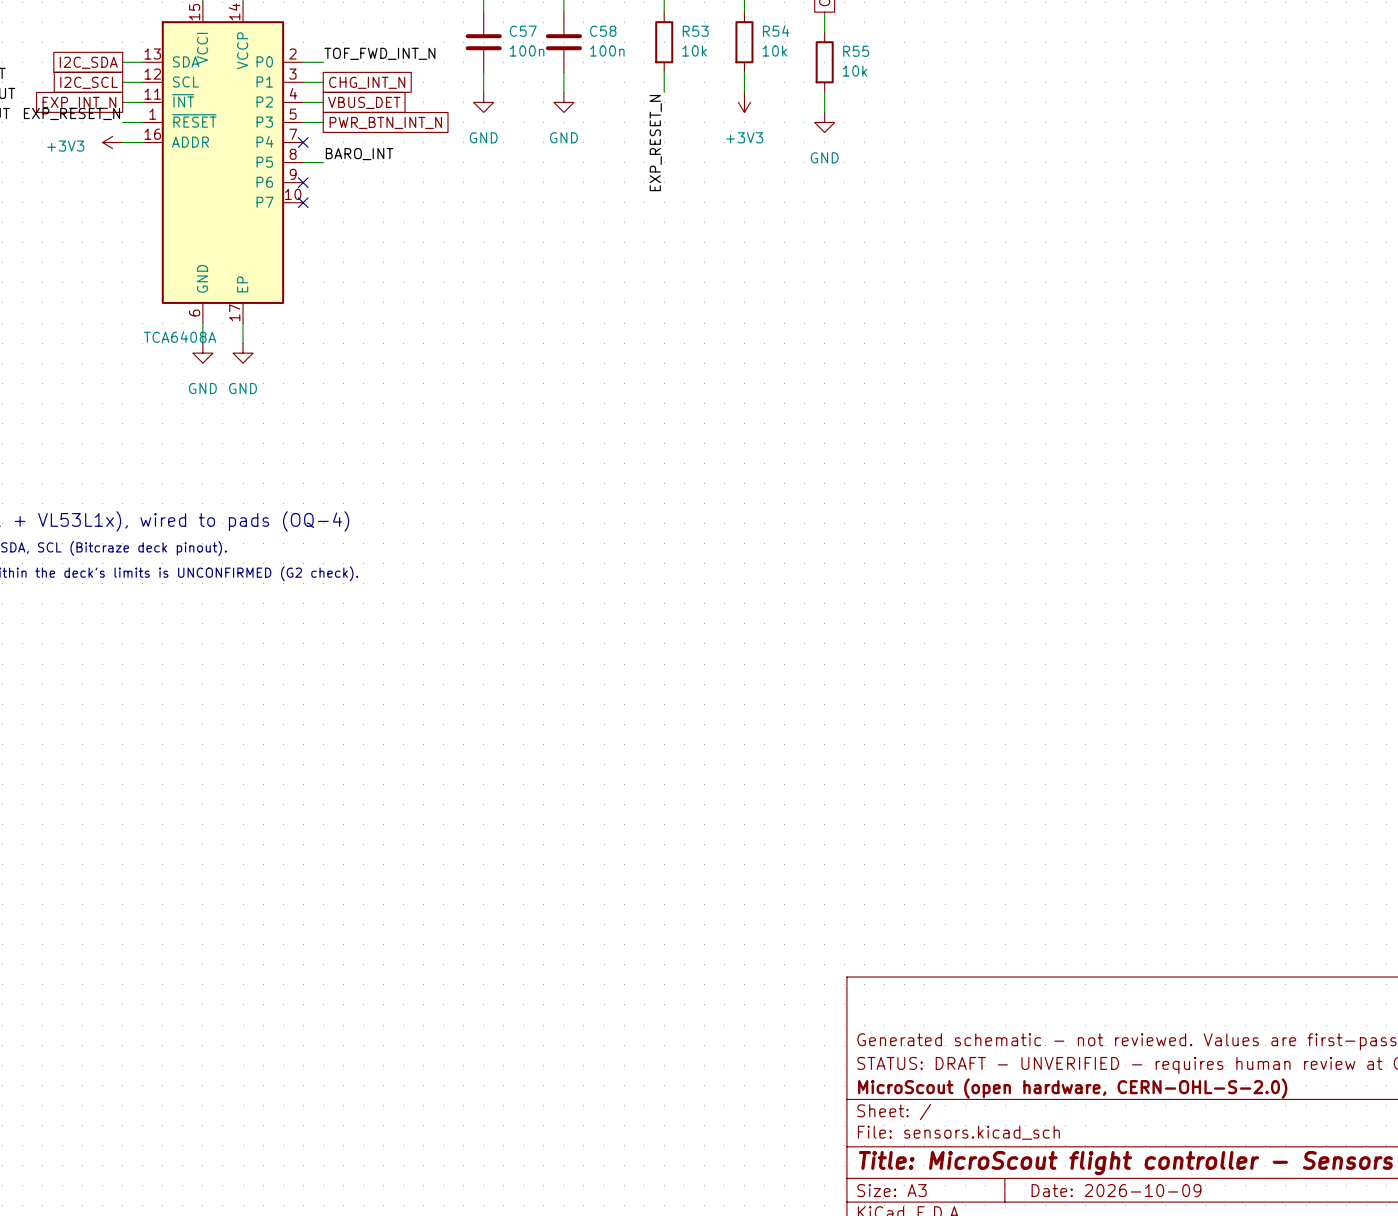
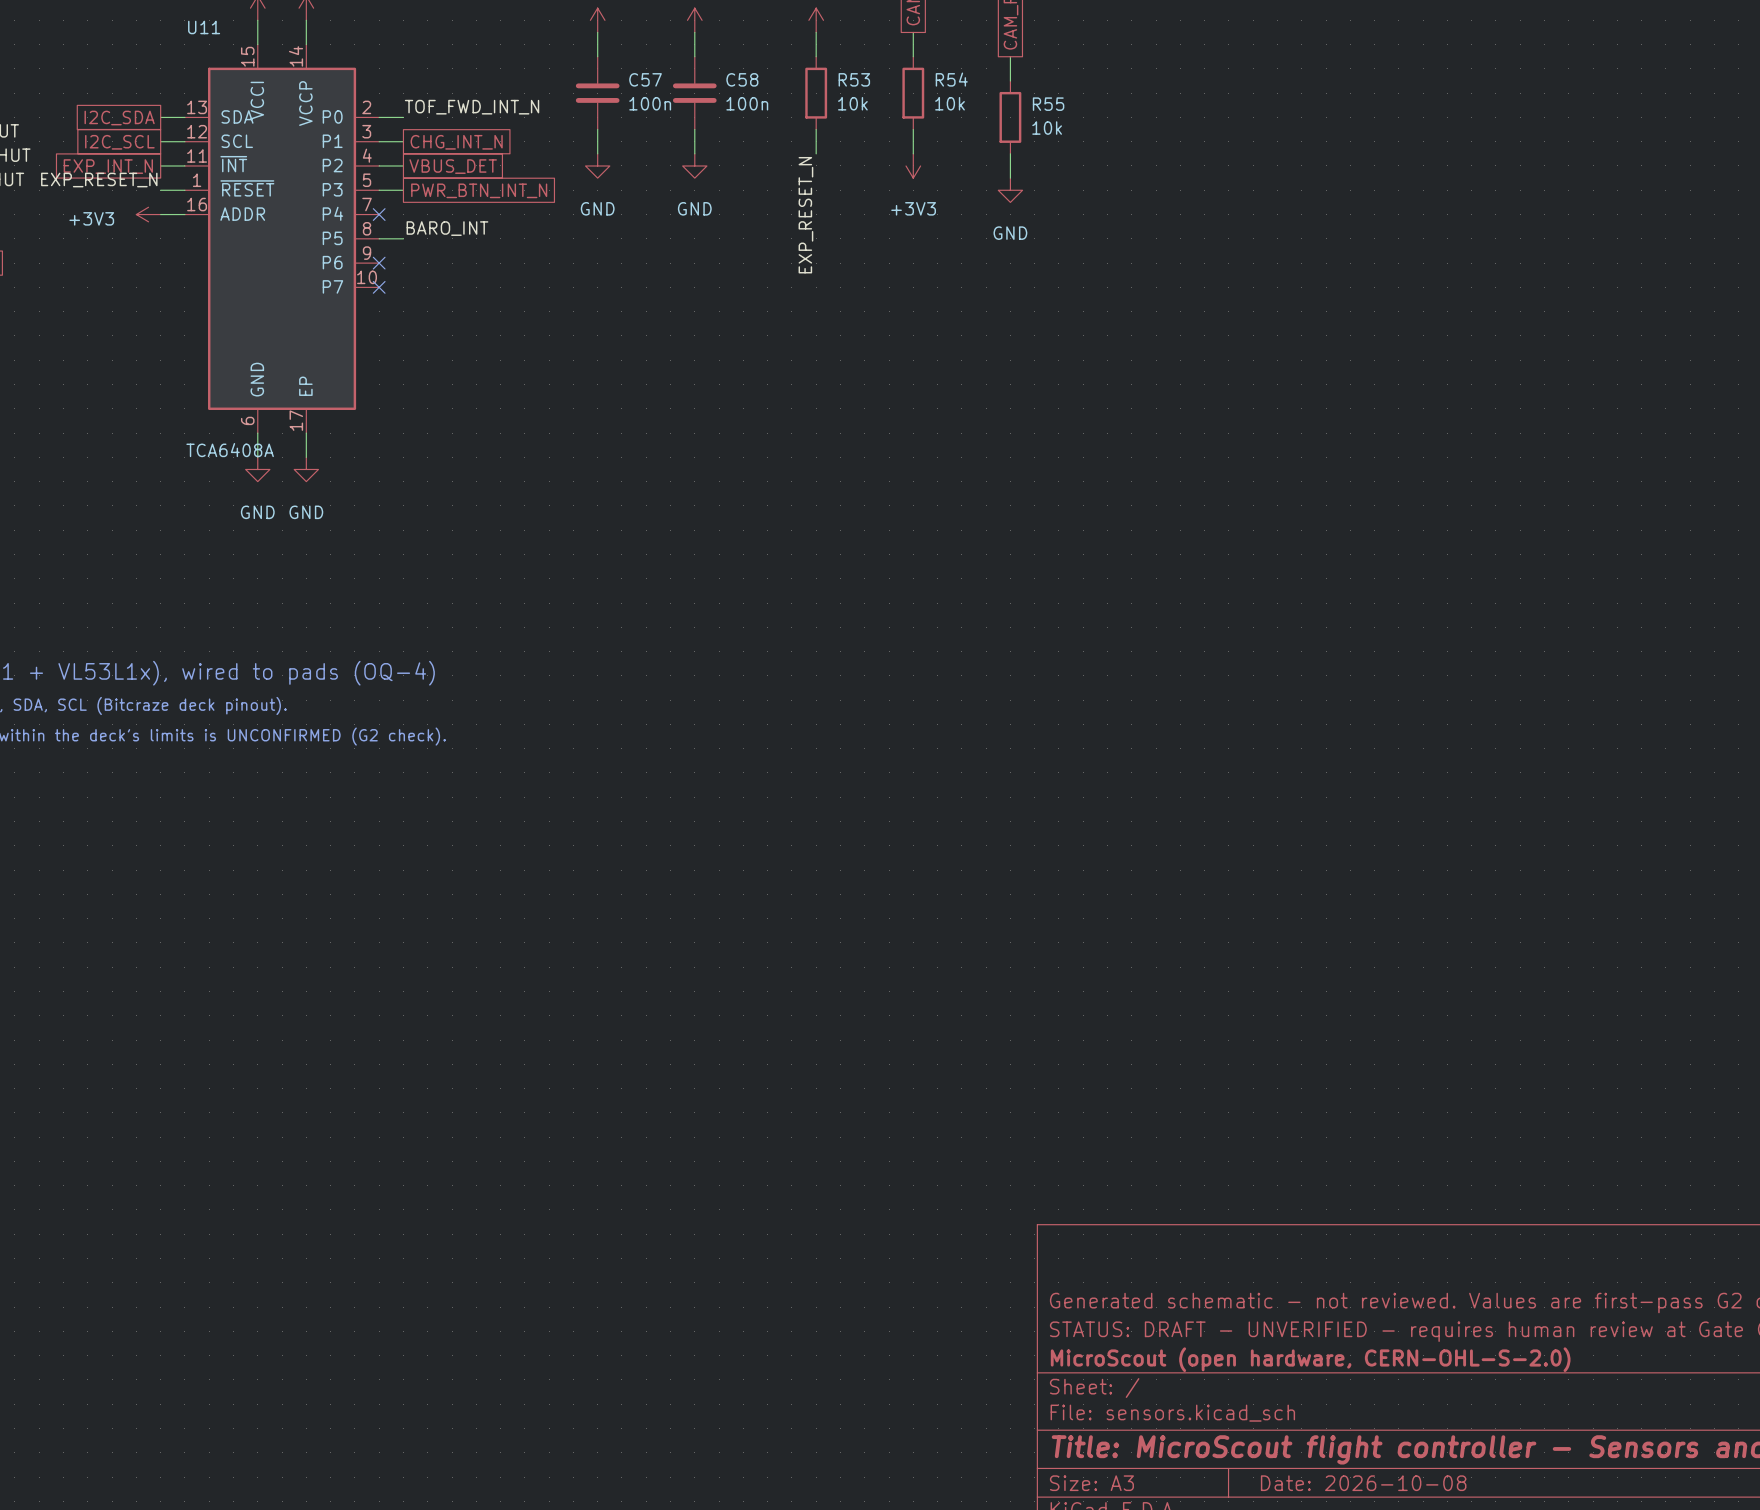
title block: Date: 2026-10-09 (1116, 1190) -> Date: 2026-10-08 (1363, 1483)

